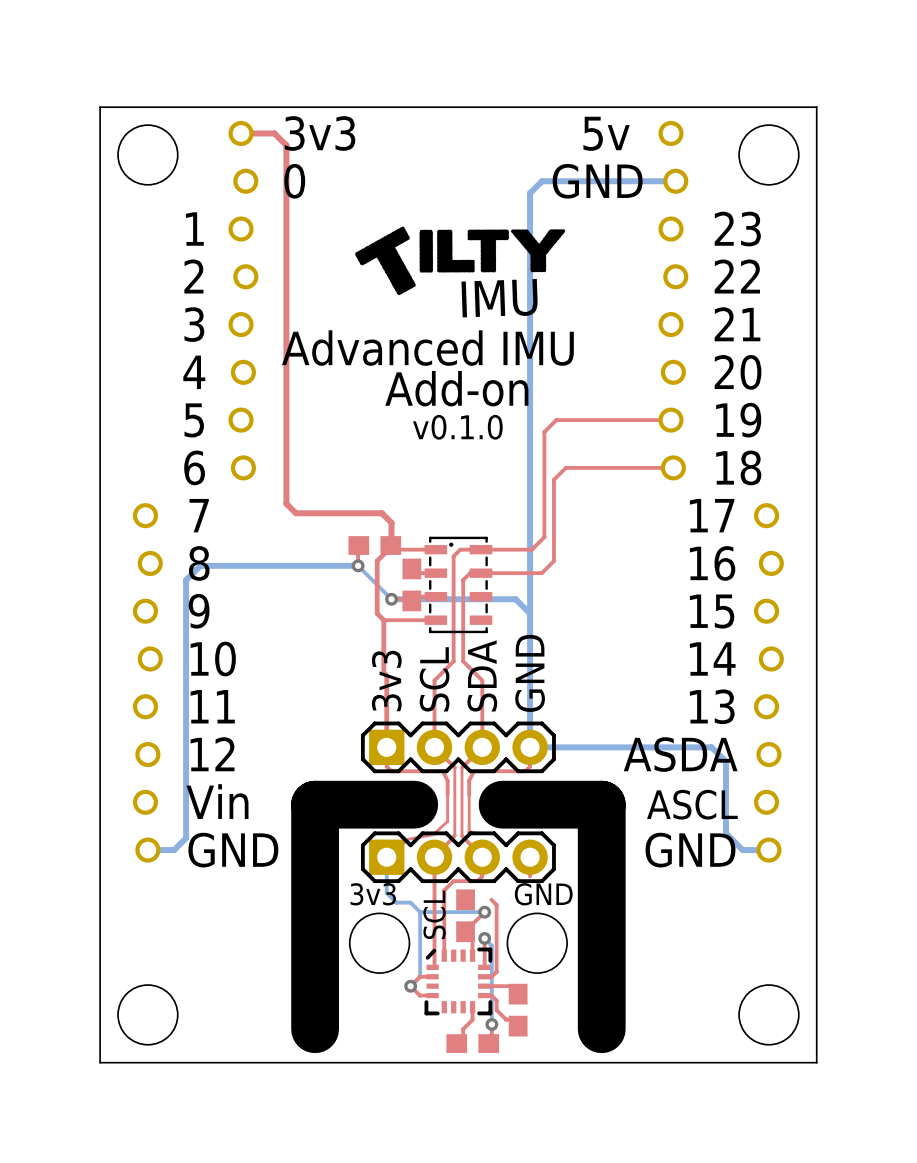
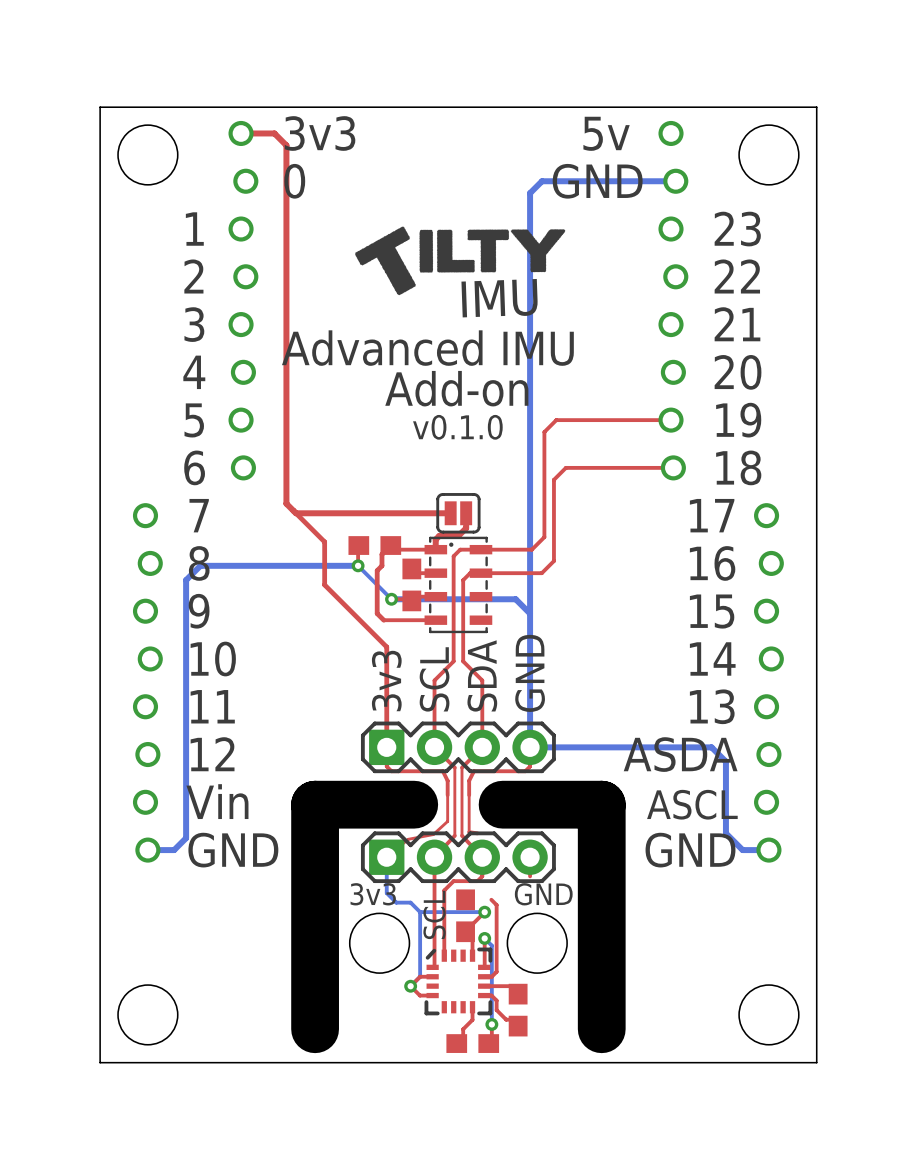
top track: (381, 513) (391, 522) (391, 544) (377, 561) (377, 570) -> (390, 545) (381, 554) (381, 565) (377, 570)
top track: none -> (381, 513) (450, 513)
part: none -> (458, 513)
top track: none -> (466, 513) (466, 528) (458, 535) (439, 535) (435, 539) (435, 549)
top track: (383, 620) (383, 672) (386, 675) -> (293, 510) (324, 541) (324, 584) (386, 647) (386, 675)

